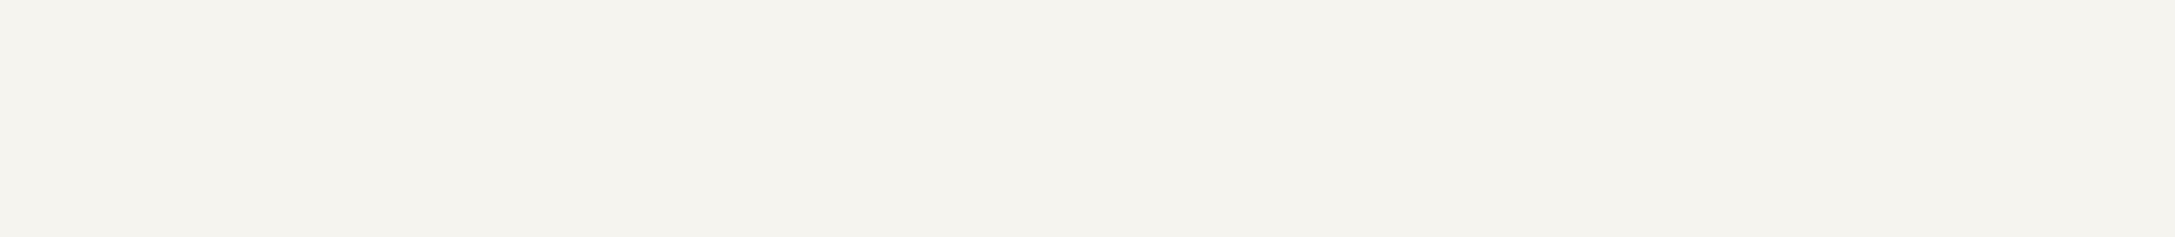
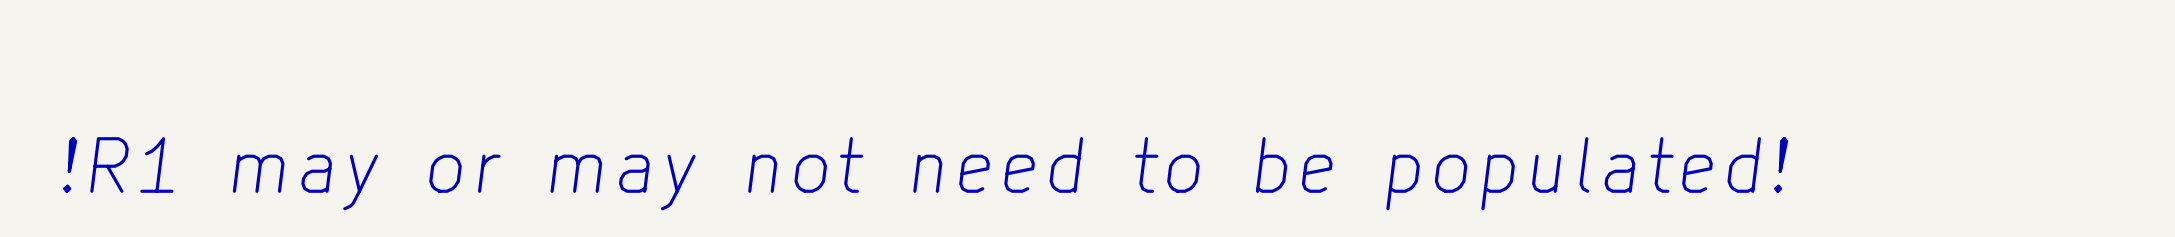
text: none -> !R1 may or may not need to be populated! (925, 173)

